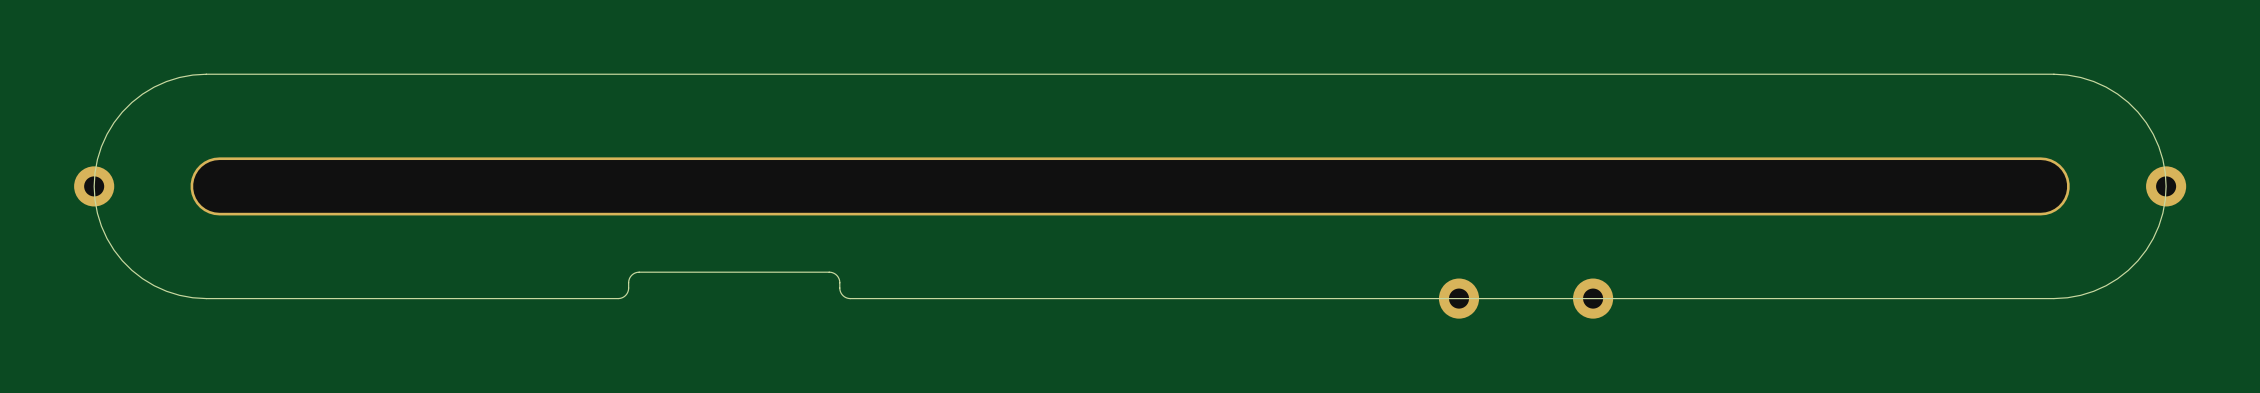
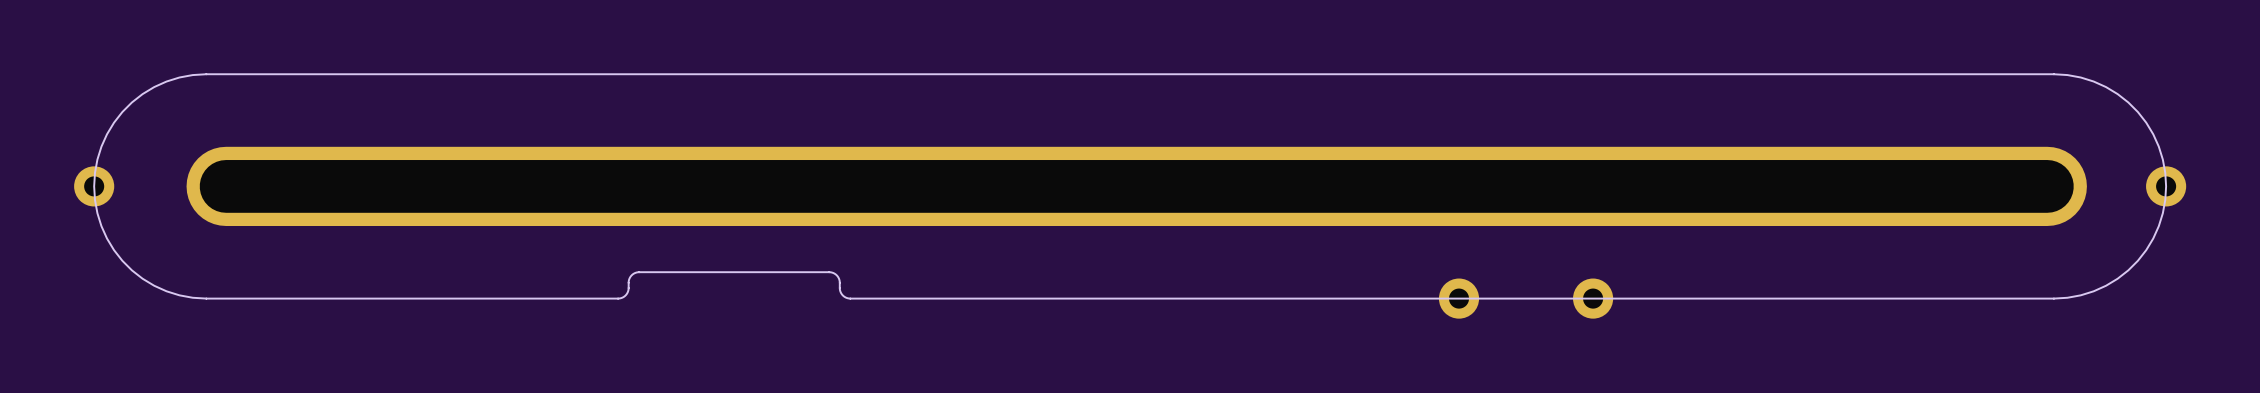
part footprint: [190, 157, 2070, 216] -> [186, 146, 2087, 227]

